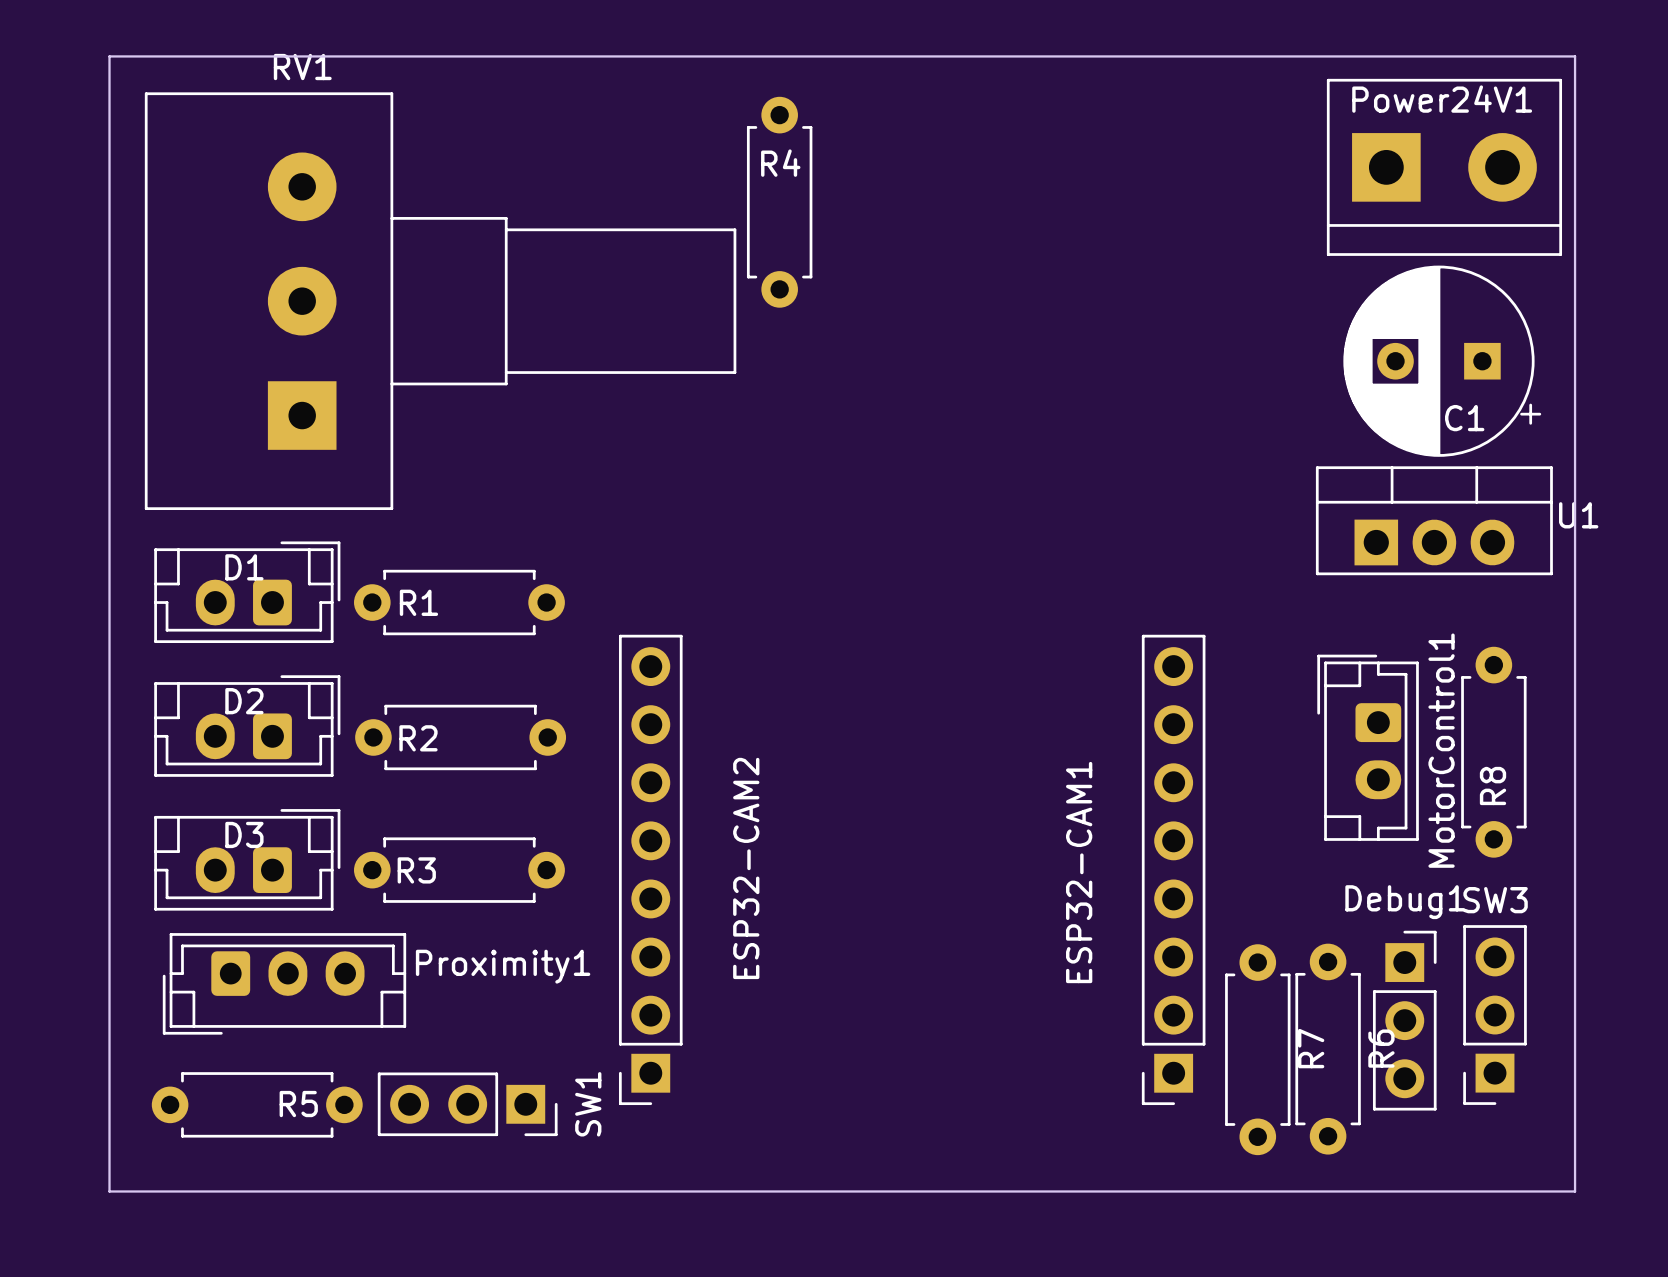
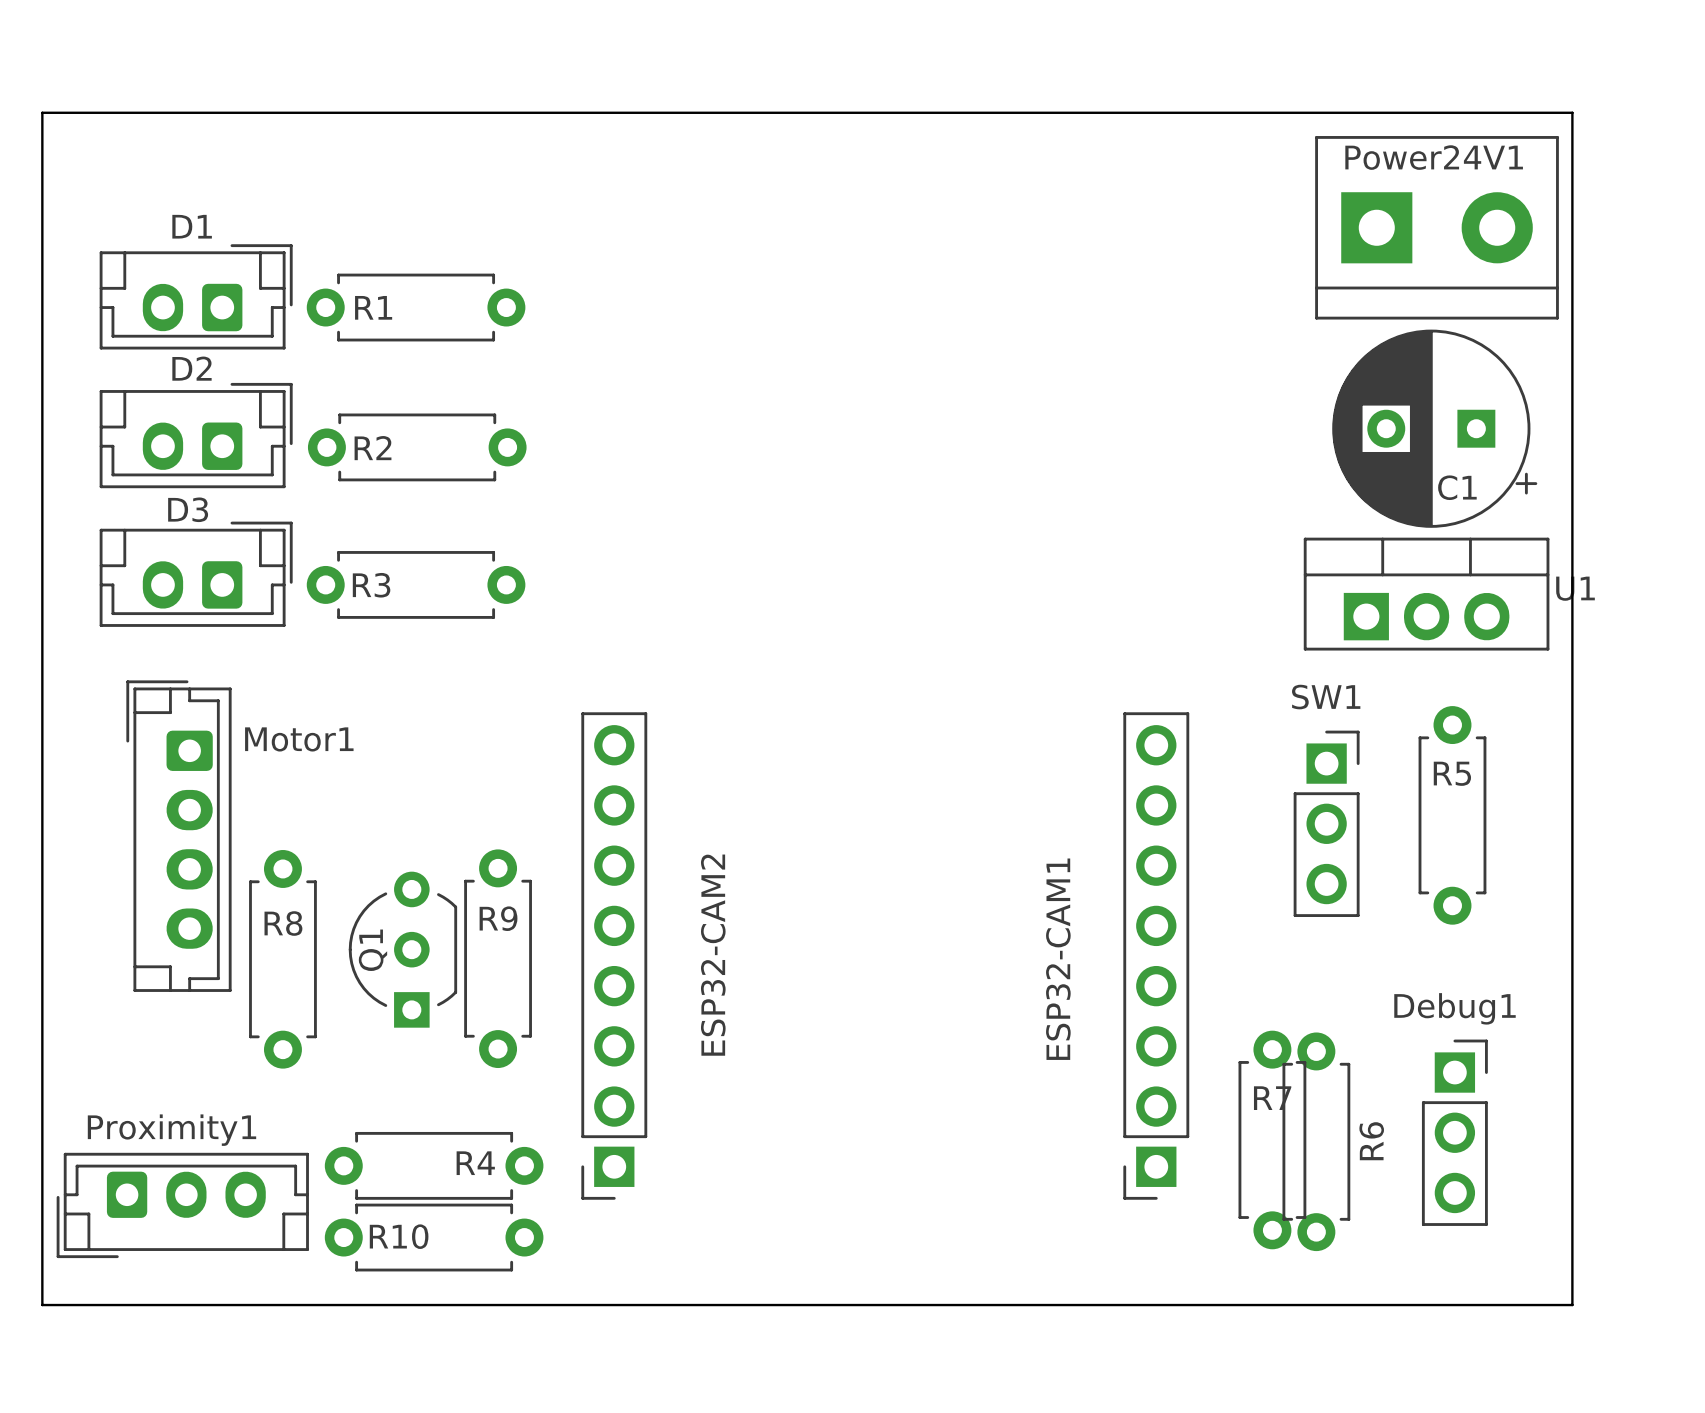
board edge: (109, 56) (109, 1191) (1575, 1191) -> (53, 112) (42, 112) (42, 1305) (1572, 1305) (1572, 1289)
R4 rotation: 0° (779, 202) -> 90° clockwise (434, 1165)
R4 position: (779, 202) -> (434, 1165)
RV1: (440, 301) -> none
D1 name position: D1 (244, 567) -> D1 (192, 226)
D1 position: (247, 592) -> (196, 296)
R1 position: (459, 602) -> (416, 307)
D2 name position: D2 (244, 701) -> D2 (191, 368)
D2 position: (247, 726) -> (196, 435)
R2 position: (460, 737) -> (417, 447)
MotorControl1: (1368, 747) -> none
R8 position: (1493, 752) -> (282, 959)
Motor1: none -> (178, 836)
R8 name rotation: 0° (1493, 785) -> 90° clockwise (283, 923)
R8 name position: R8 (1493, 785) -> R8 (283, 923)
D3 name position: D3 (244, 834) -> D3 (188, 509)
D3 position: (247, 859) -> (196, 574)
Q1: none -> (402, 949)
R3 position: (459, 870) -> (416, 584)
R9: none -> (498, 958)
Proximity1 name position: Proximity1 (503, 966) -> Proximity1 (171, 1130)
Proximity1 position: (284, 983) -> (182, 1205)
SW3: (1495, 1015) -> none
Debug1 position: (1404, 1020) -> (1454, 1132)
R7 name rotation: 0° (1311, 1048) -> 90° clockwise (1272, 1098)
R7 position: (1257, 1049) -> (1272, 1139)
R5 rotation: 0° (257, 1104) -> 90° clockwise (1452, 815)
R5 position: (257, 1104) -> (1452, 815)
R5 name position: R5 (298, 1104) -> R5 (1452, 773)
SW1 rotation: 0° (467, 1104) -> 90° counterclockwise (1326, 823)
SW1 position: (467, 1104) -> (1326, 823)
R10: none -> (434, 1237)

